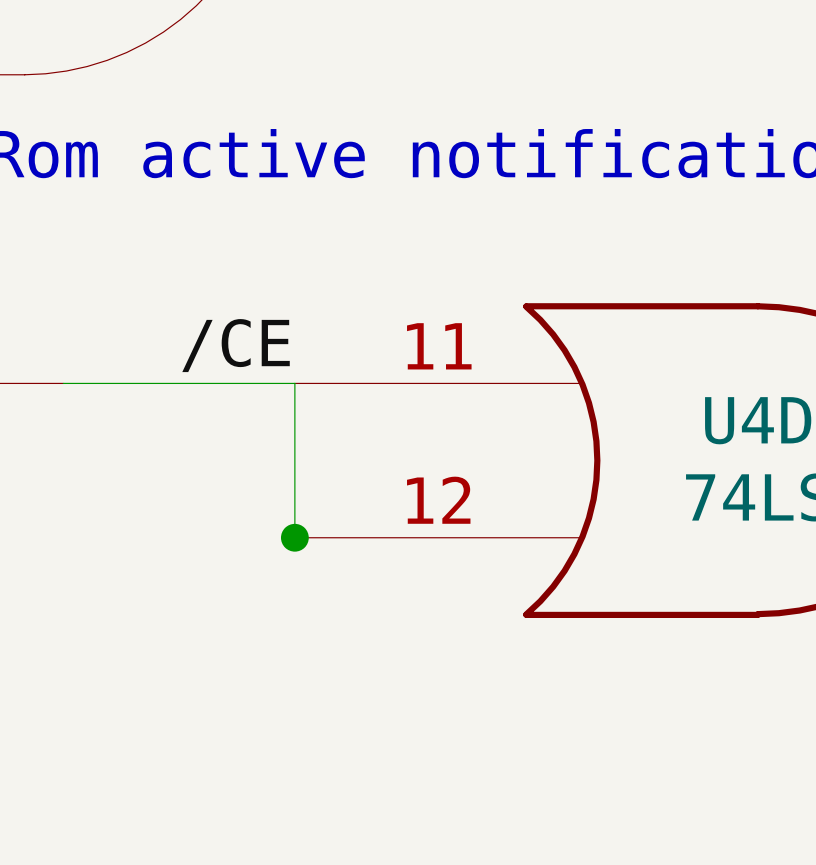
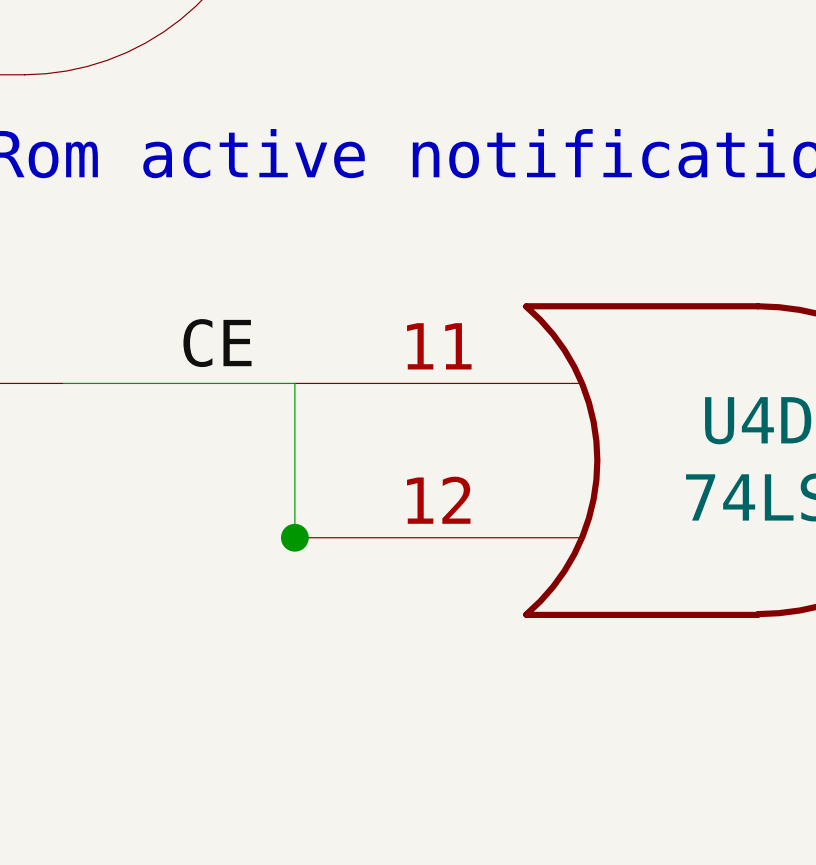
label: /CE (236, 345) -> CE (217, 343)

